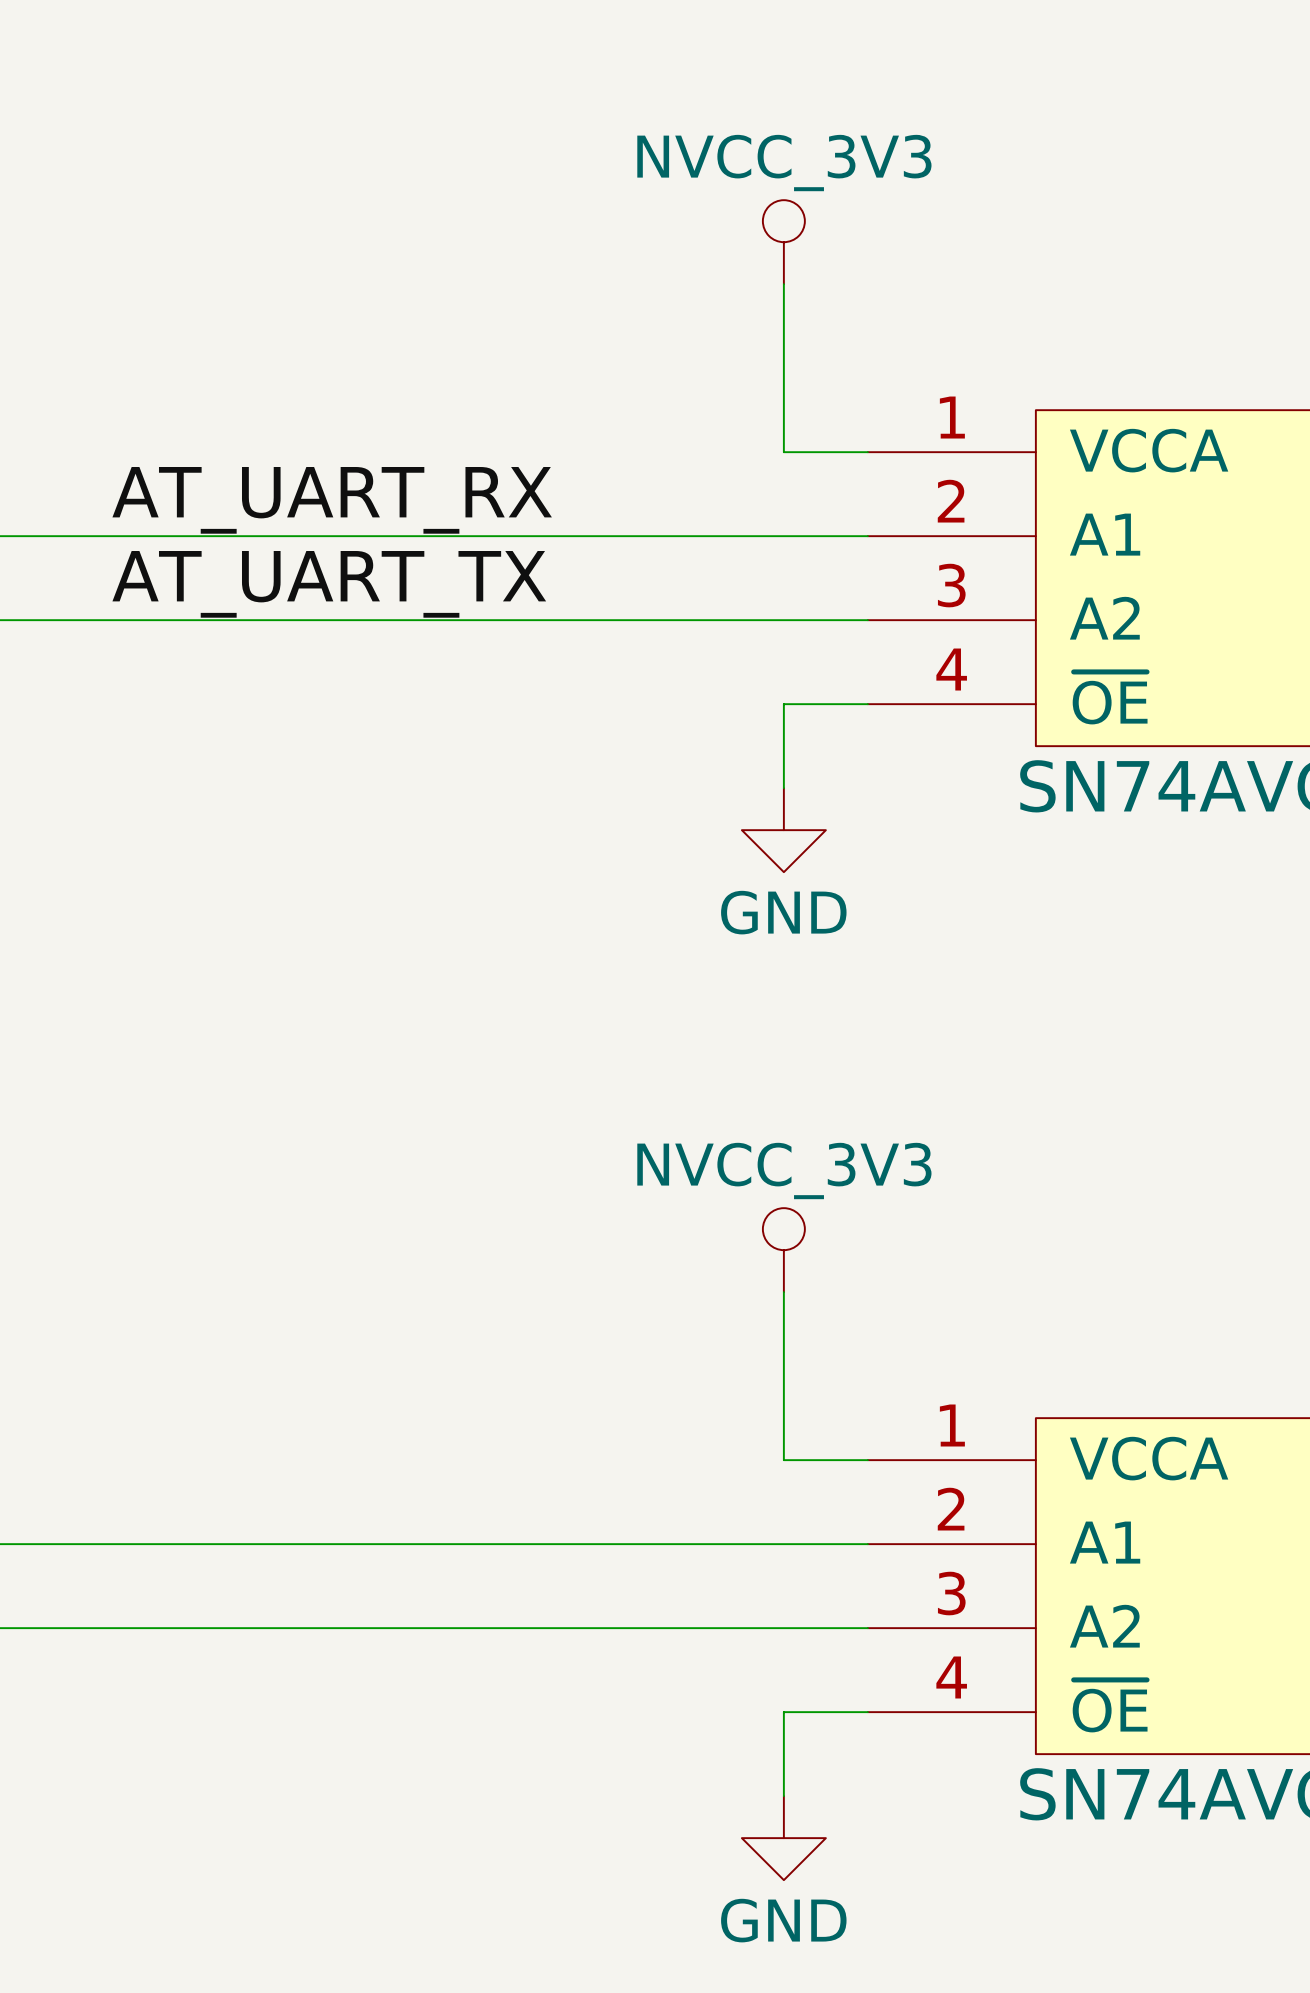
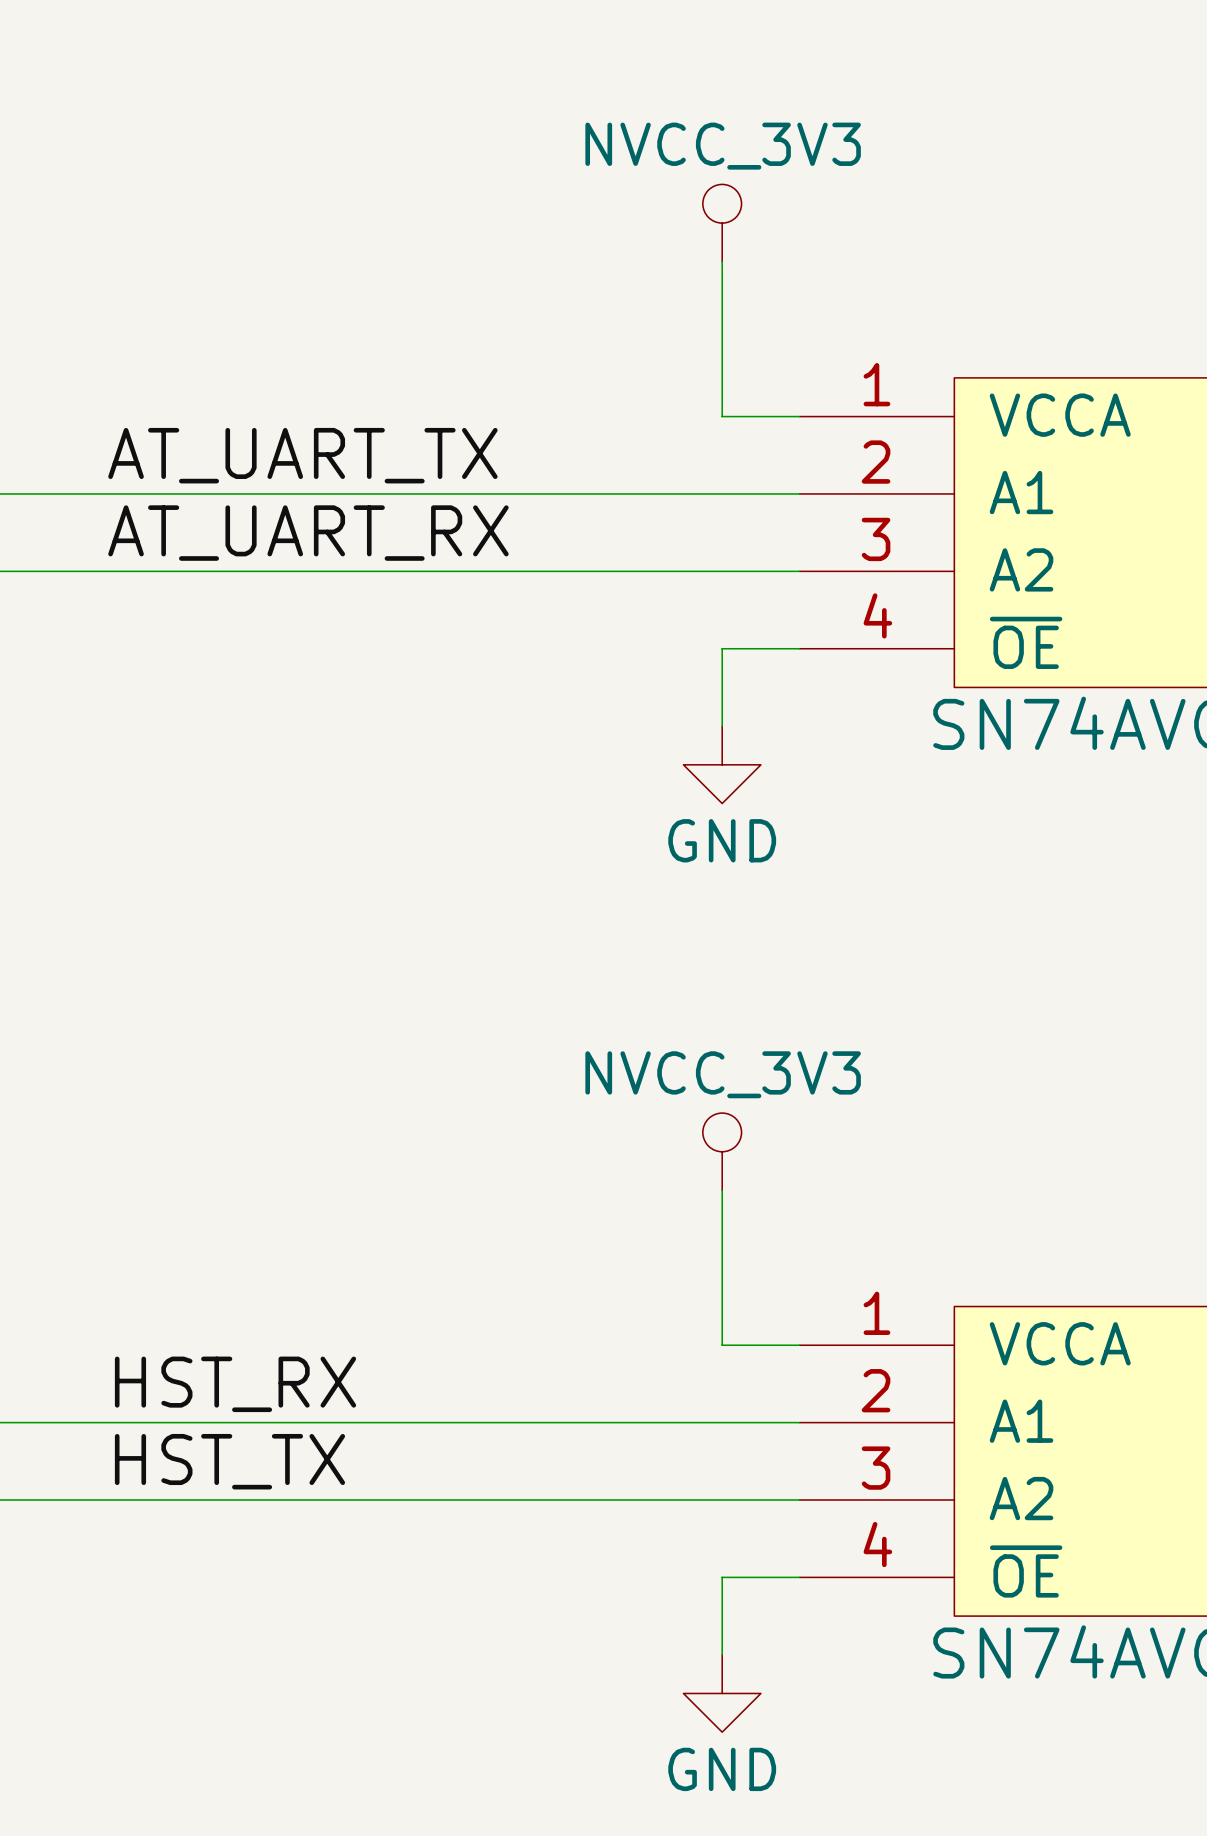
label: AT_UART_RX (332, 500) -> AT_UART_TX (302, 455)
label: AT_UART_TX (329, 584) -> AT_UART_RX (308, 533)
label: none -> HST_RX (235, 1384)
label: none -> HST_TX (229, 1461)

